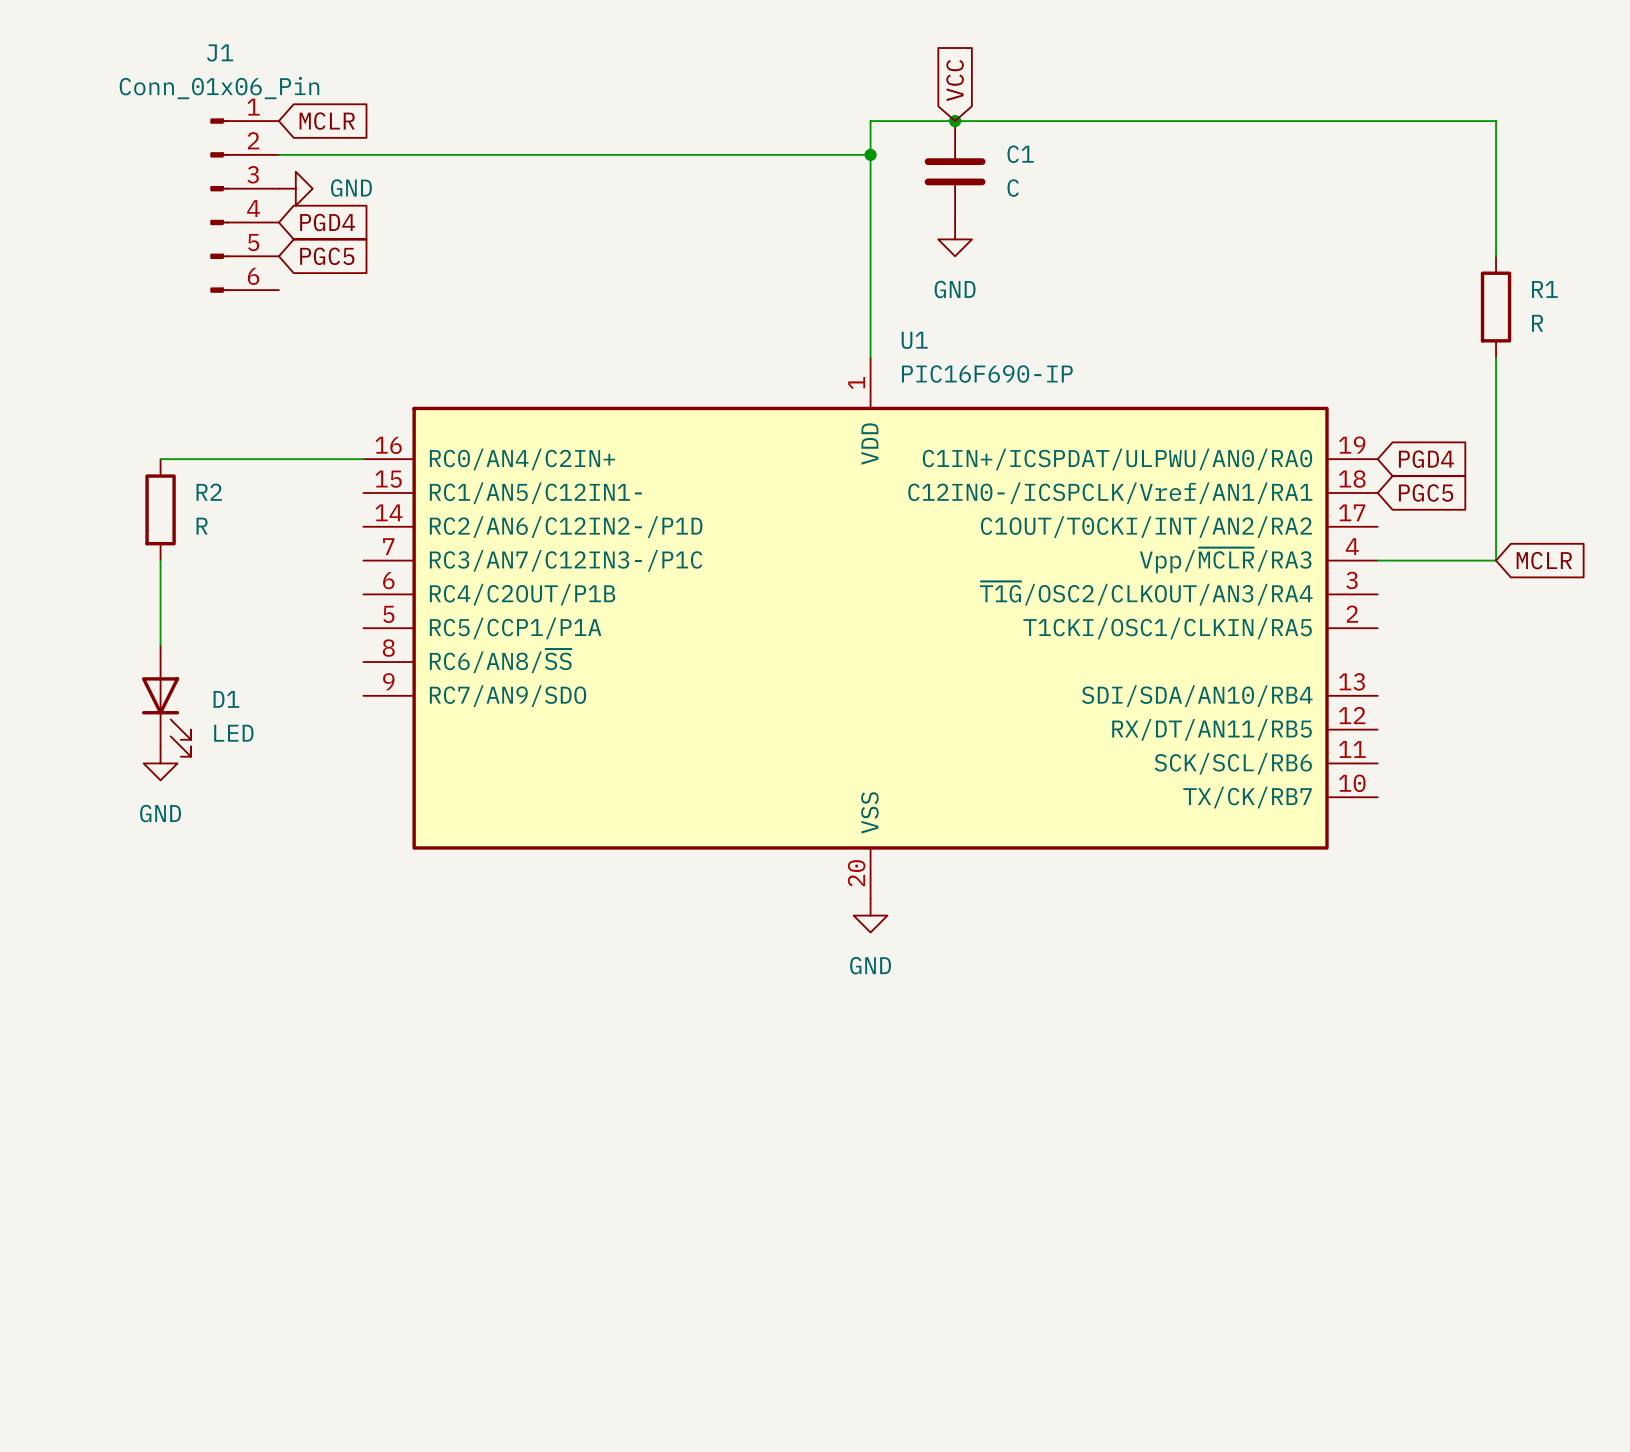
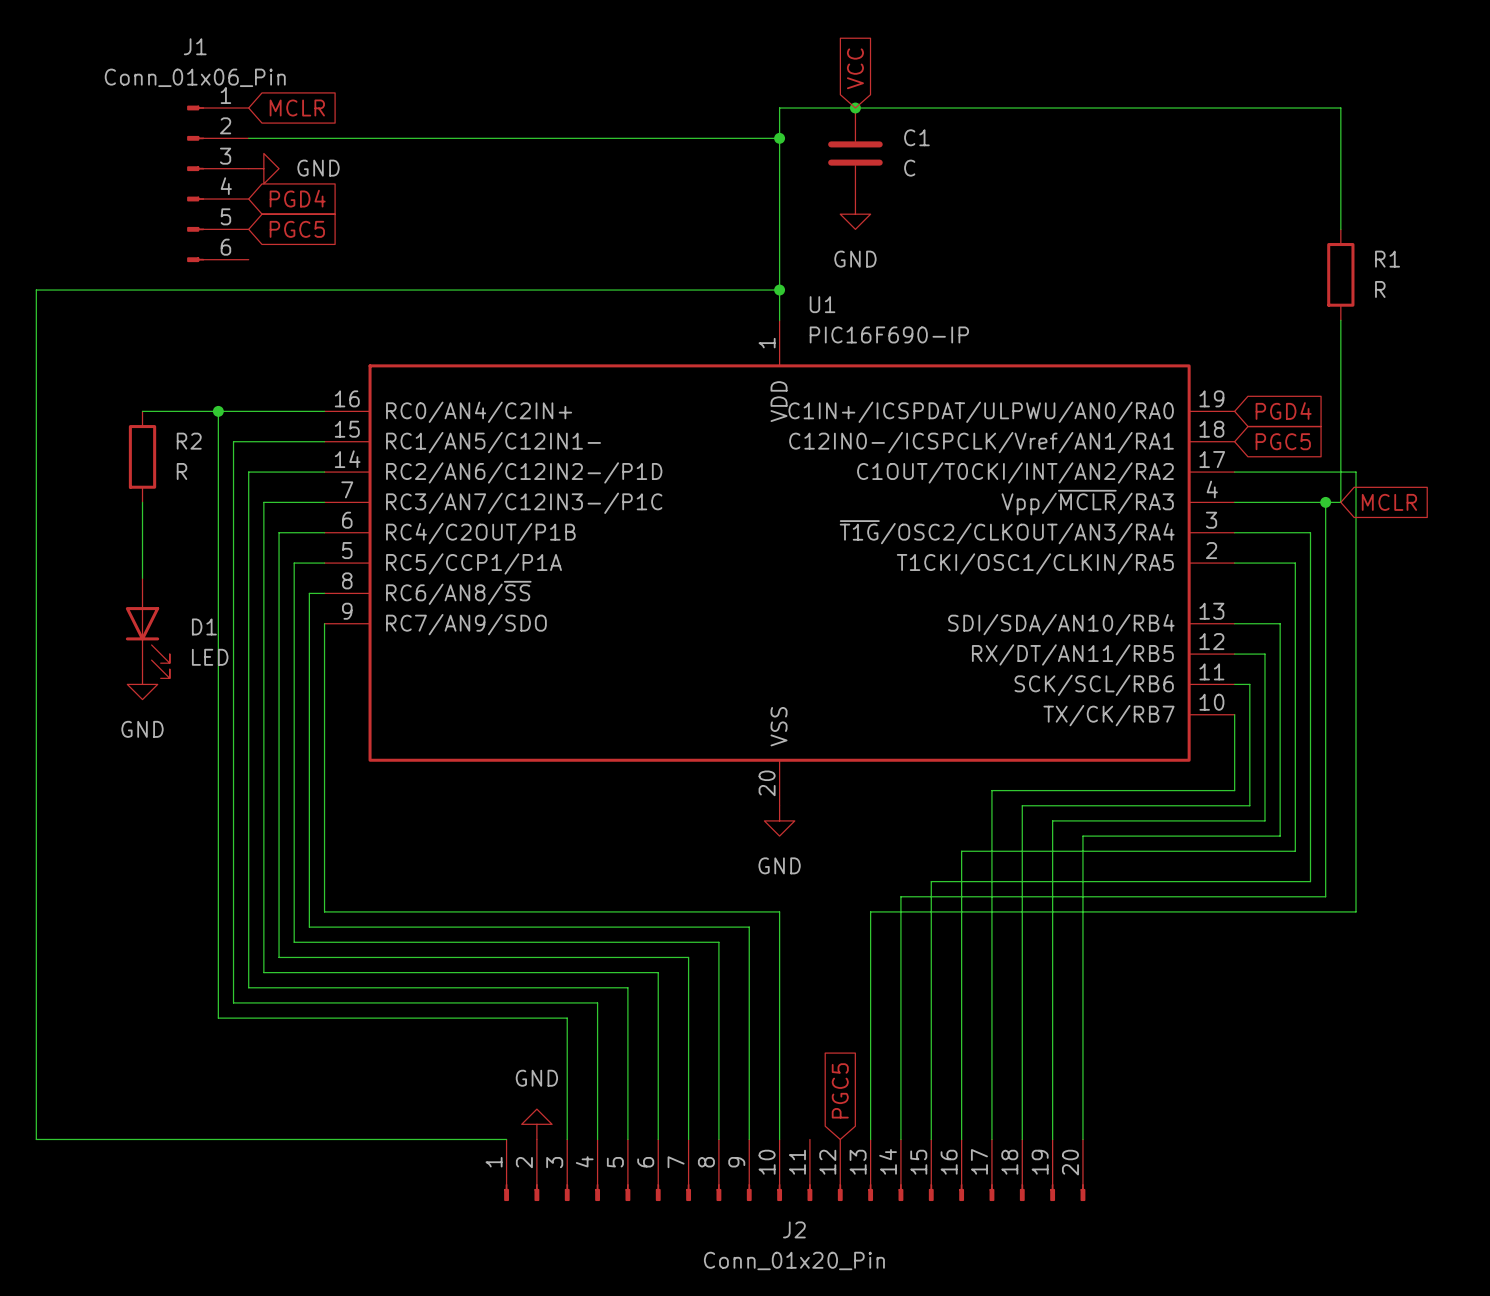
wire: none -> (779, 290) (36, 290) (36, 1139) (506, 1139)
junction: none -> (779, 290)
wire: none -> (218, 411) (218, 1018) (567, 1018) (567, 1139)
junction: none -> (218, 411)
wire: none -> (324, 441) (233, 441) (233, 1002) (597, 1002) (597, 1139)
wire: none -> (324, 472) (248, 472) (248, 987) (627, 987) (627, 1139)
wire: none -> (1234, 472) (1356, 472) (1356, 911) (870, 911) (870, 1139)
wire: none -> (324, 502) (263, 502) (263, 972) (658, 972) (658, 1139)
wire: none -> (1325, 502) (1325, 896) (900, 896) (900, 1139)
junction: none -> (1325, 502)
wire: none -> (324, 532) (279, 532) (279, 957) (688, 957) (688, 1139)
wire: none -> (1234, 532) (1310, 532) (1310, 881) (931, 881) (931, 1139)
wire: none -> (324, 563) (294, 563) (294, 942) (718, 942) (718, 1139)
wire: none -> (1234, 563) (1295, 563) (1295, 851) (961, 851) (961, 1139)
wire: none -> (324, 593) (309, 593) (309, 927) (749, 927) (749, 1139)
wire: none -> (324, 623) (324, 911) (779, 911) (779, 1139)
wire: none -> (1234, 623) (1280, 623) (1280, 836) (1082, 836) (1082, 1139)
wire: none -> (1234, 654) (1264, 654) (1264, 820) (1052, 820) (1052, 1139)
wire: none -> (1234, 684) (1249, 684) (1249, 805) (1022, 805) (1022, 1139)
wire: none -> (1234, 714) (1234, 790) (991, 790) (991, 1139)
global label: none -> PGC5 (840, 1090)
power symbol: none -> GND (536, 1124)
J2: none -> Conn_01x20_Pin (794, 1170)

